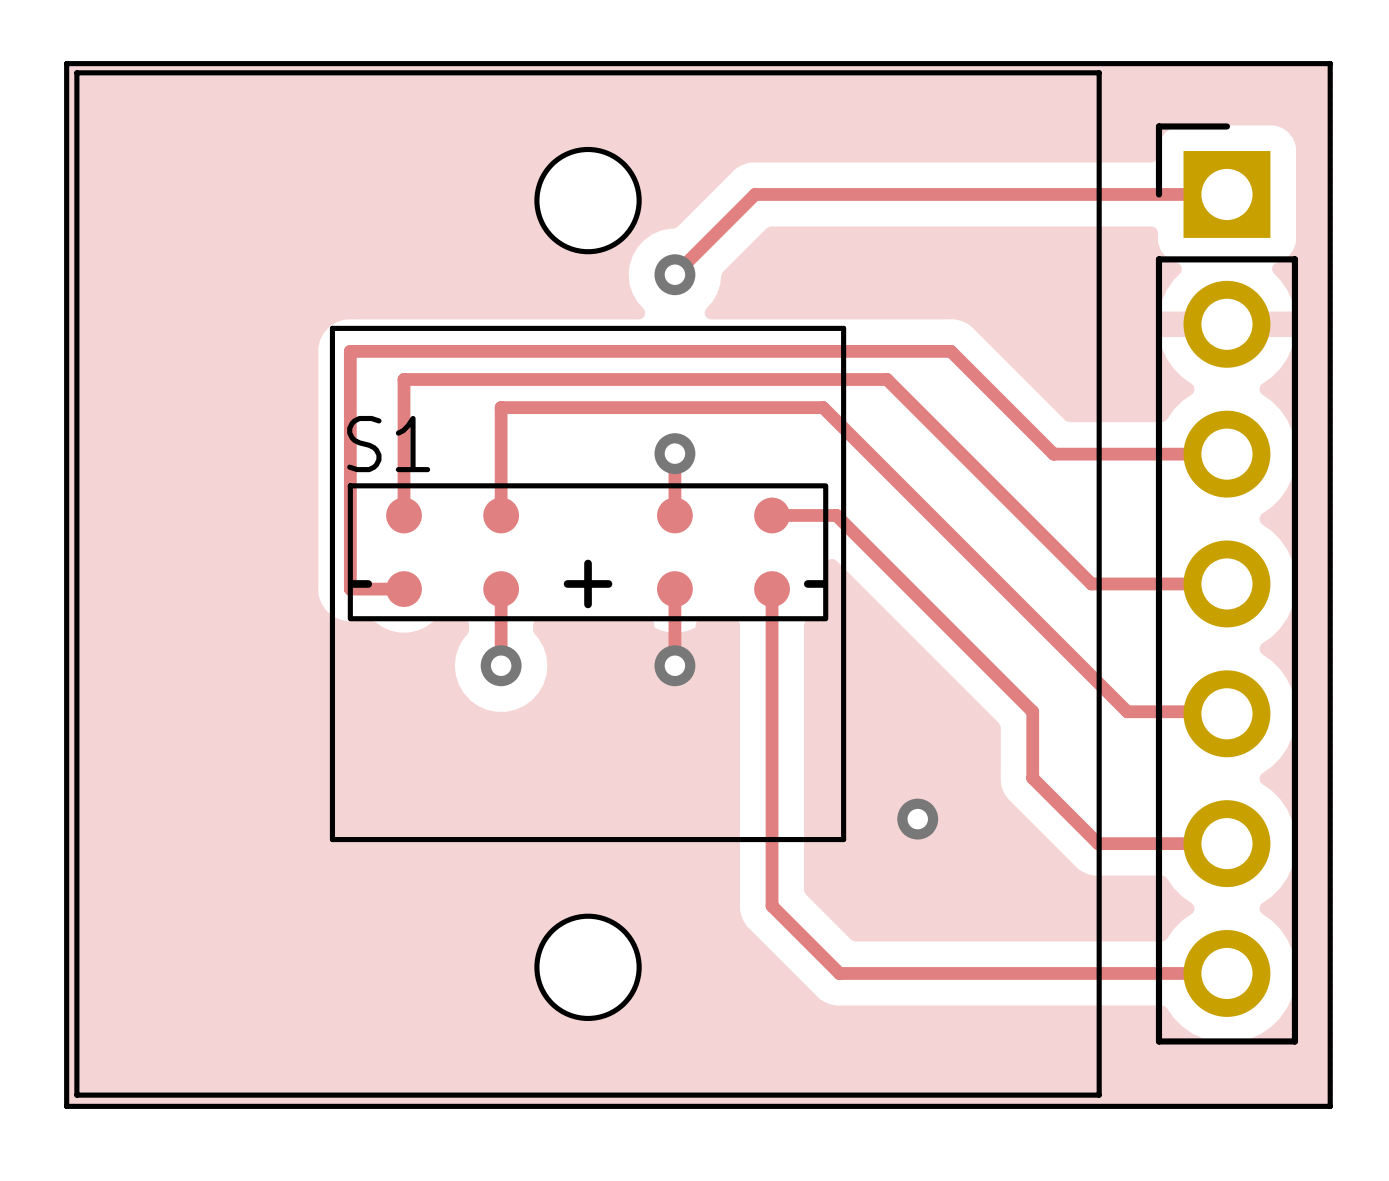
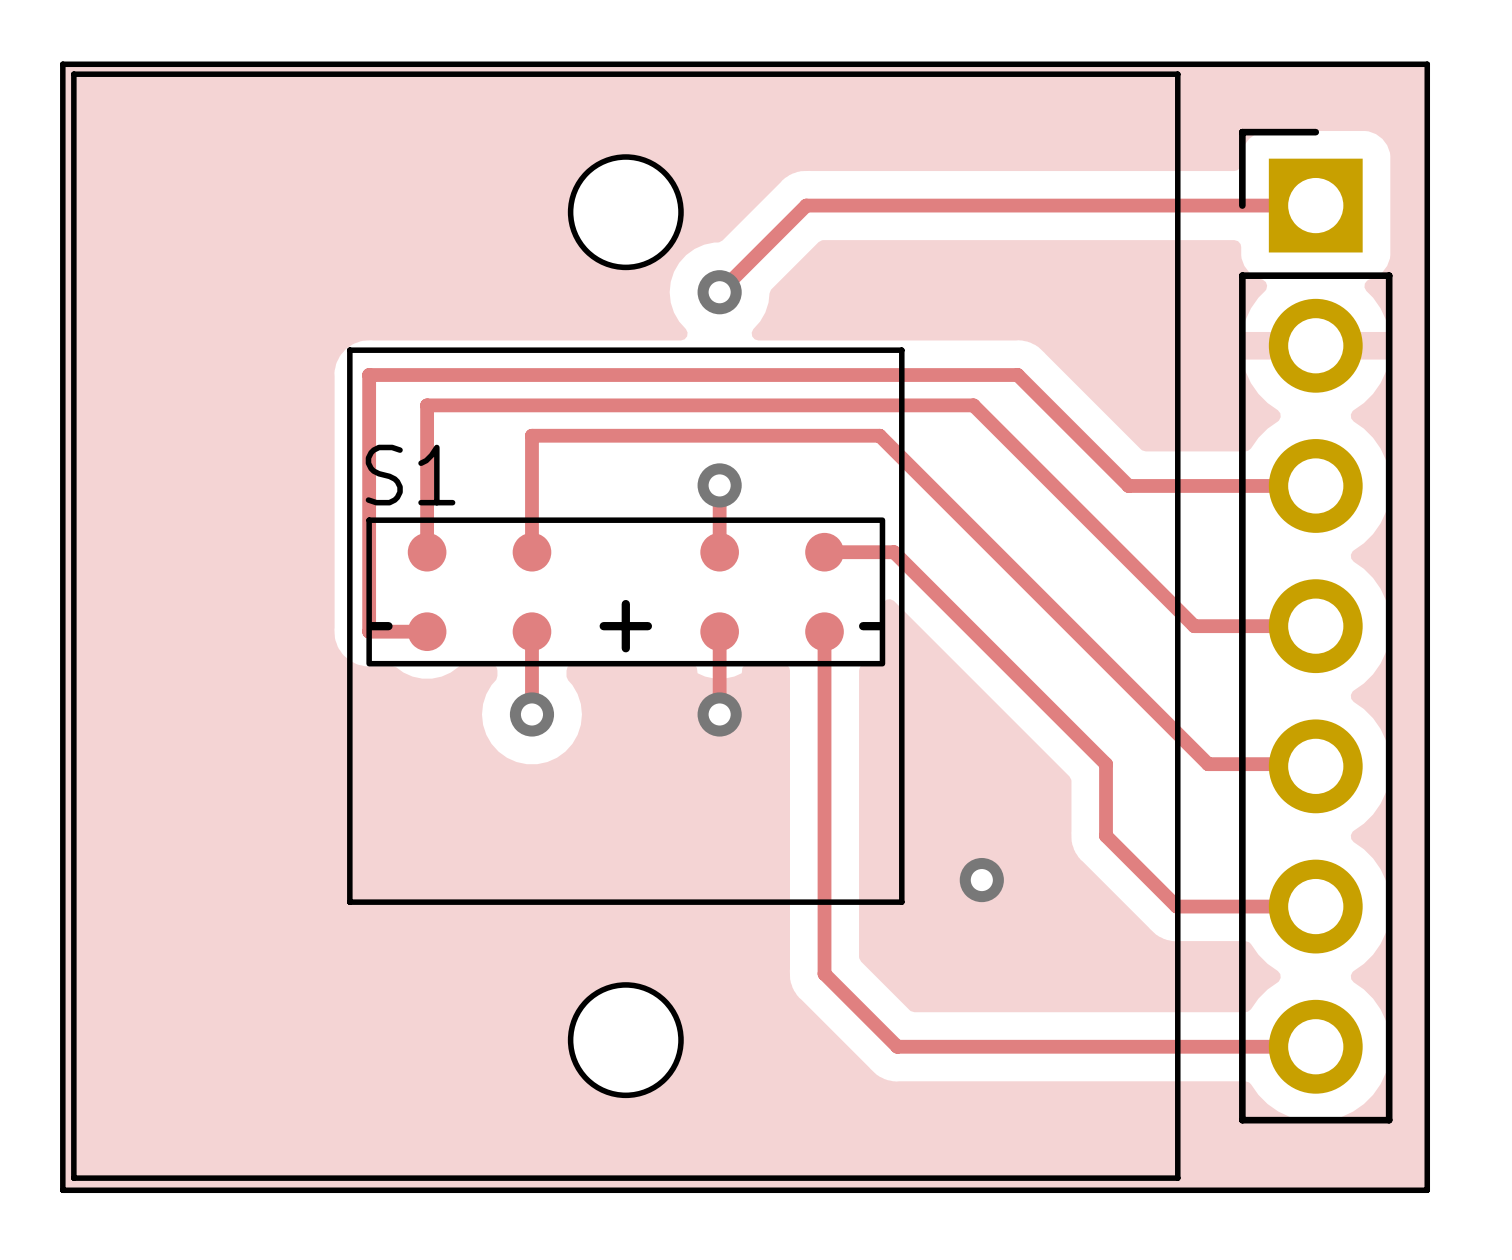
track: (887, 379) (1091, 583) (1114, 583) -> (948, 405) (973, 405) (1194, 626)

